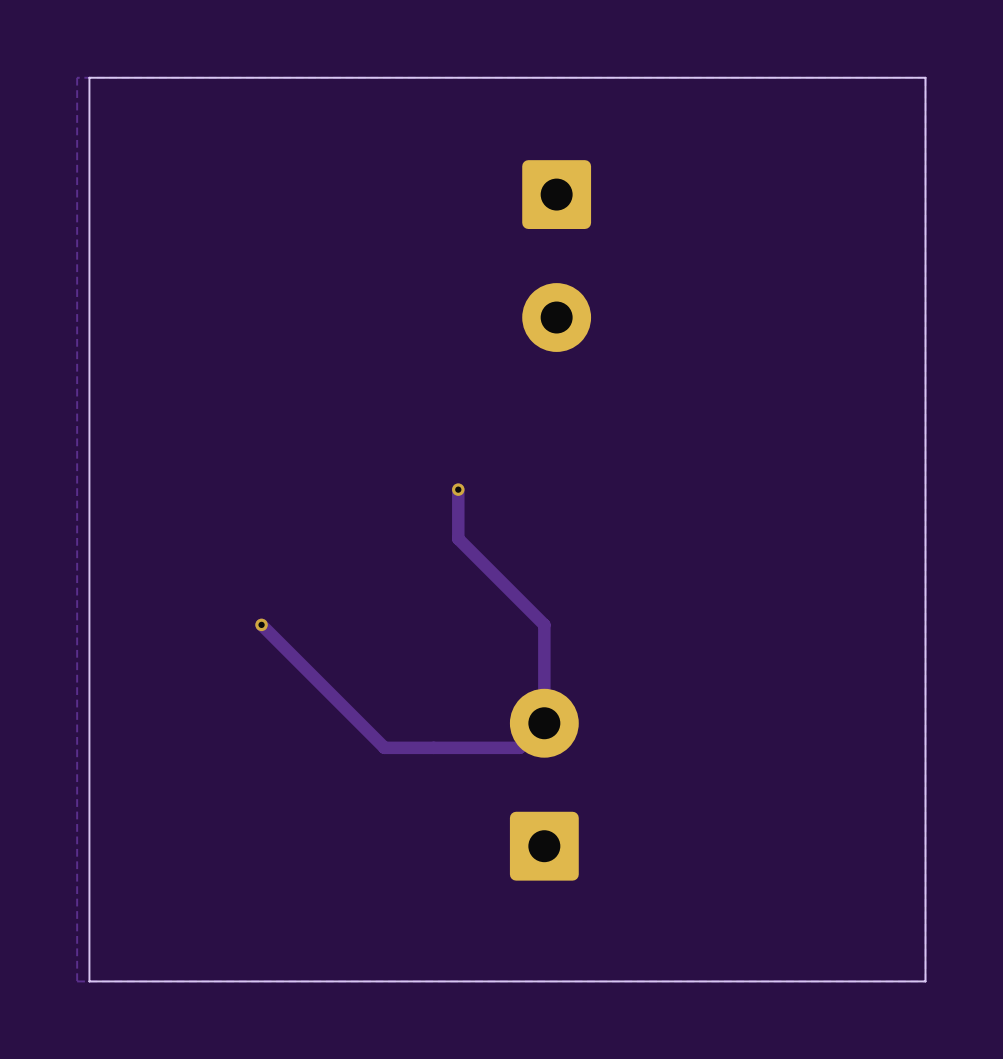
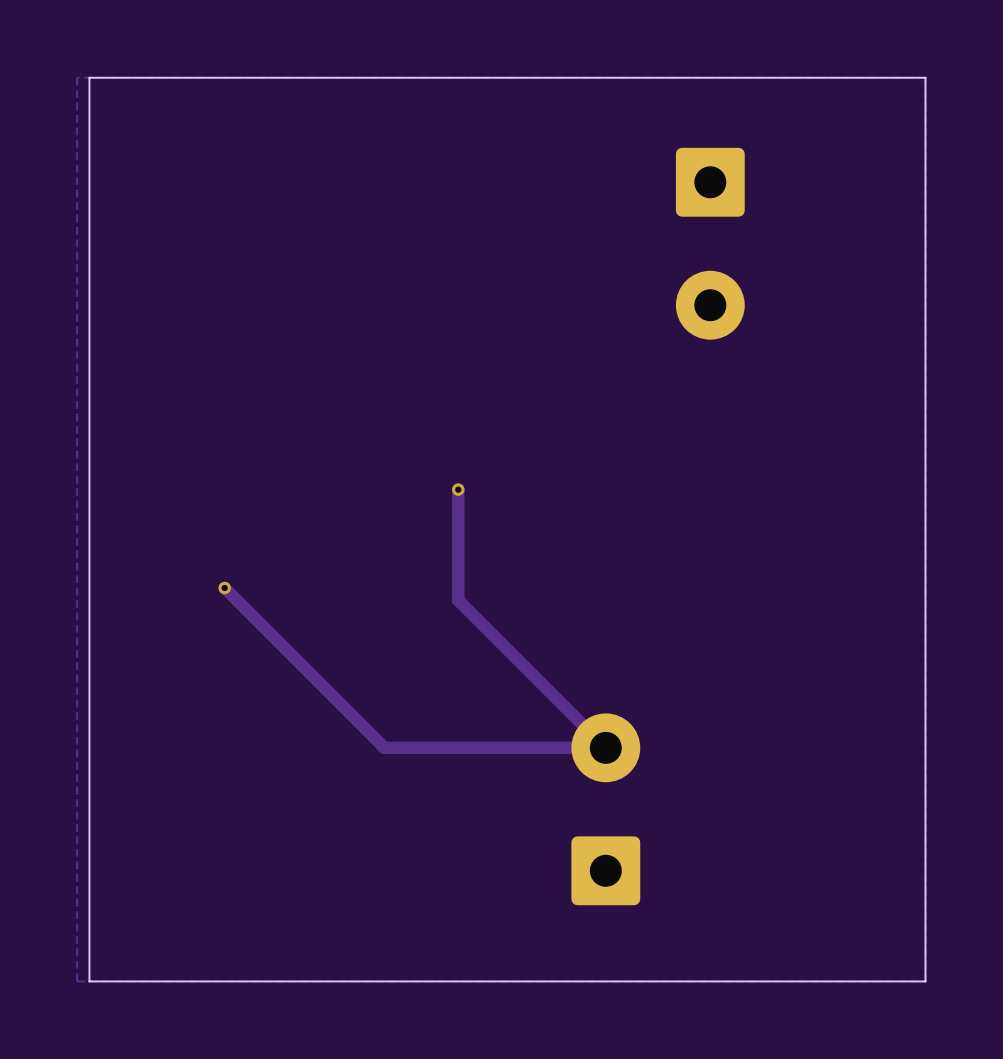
part position: (556, 256) -> (710, 243)
track: (458, 538) (544, 624) (544, 723) (519, 747) -> (458, 538) (458, 600) (605, 747) (519, 747)
track: none -> (224, 588) (261, 624)
via position: (261, 624) -> (224, 588)
part position: (544, 784) -> (605, 809)

